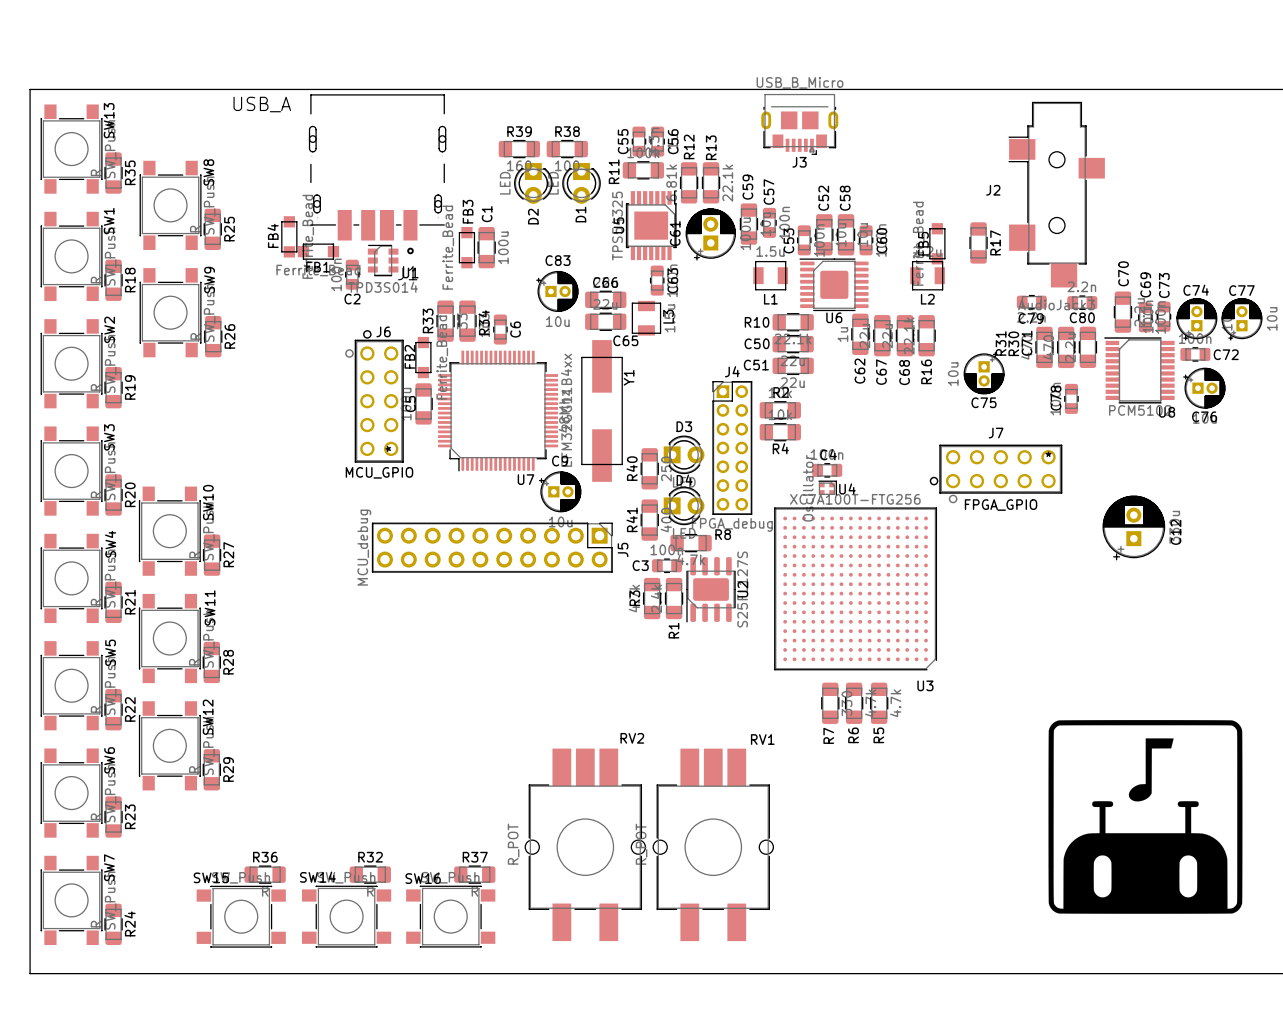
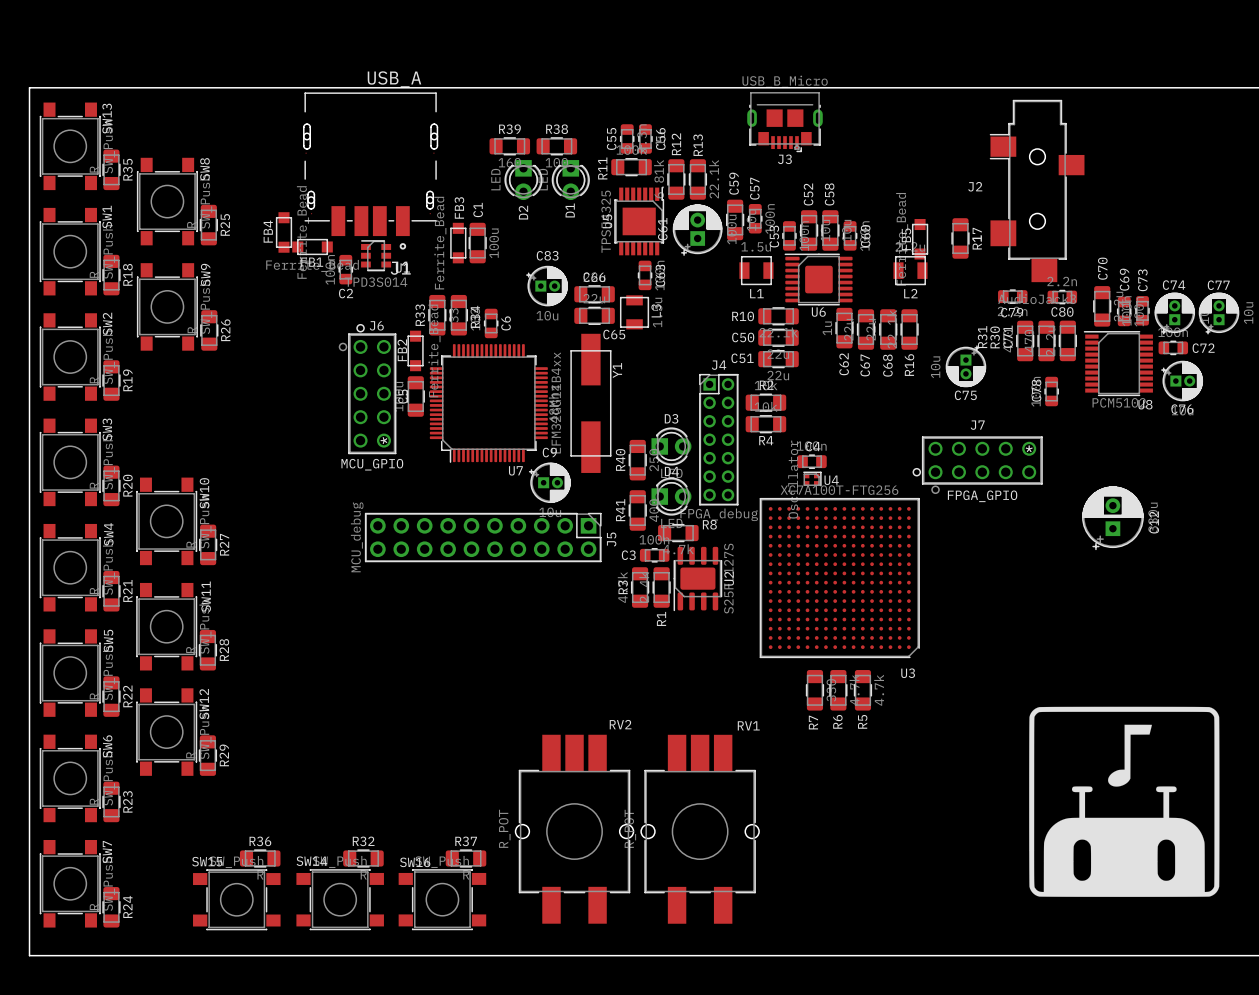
J1 value position: USB_A (262, 104) -> USB_A (394, 79)

